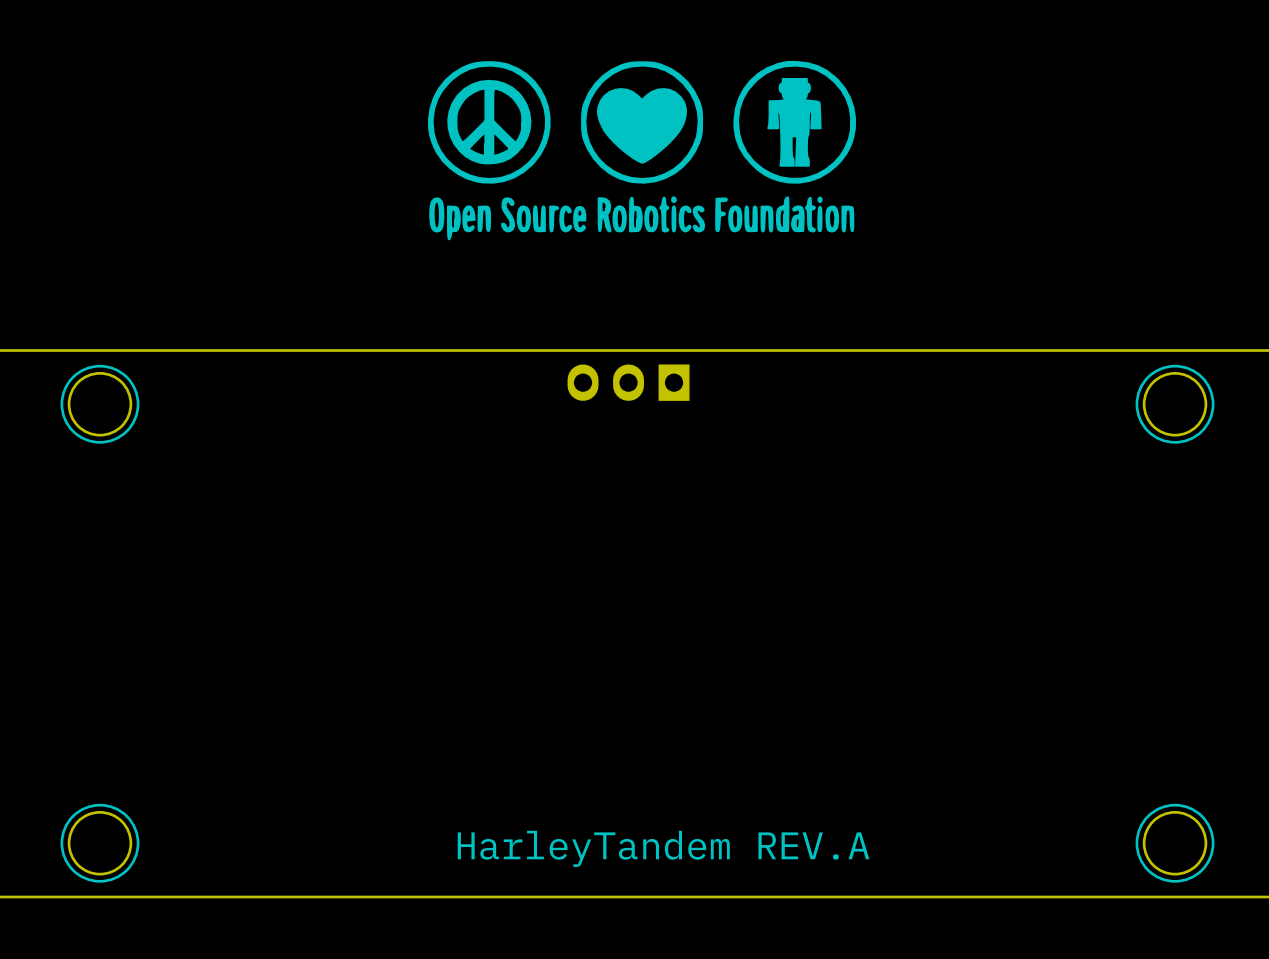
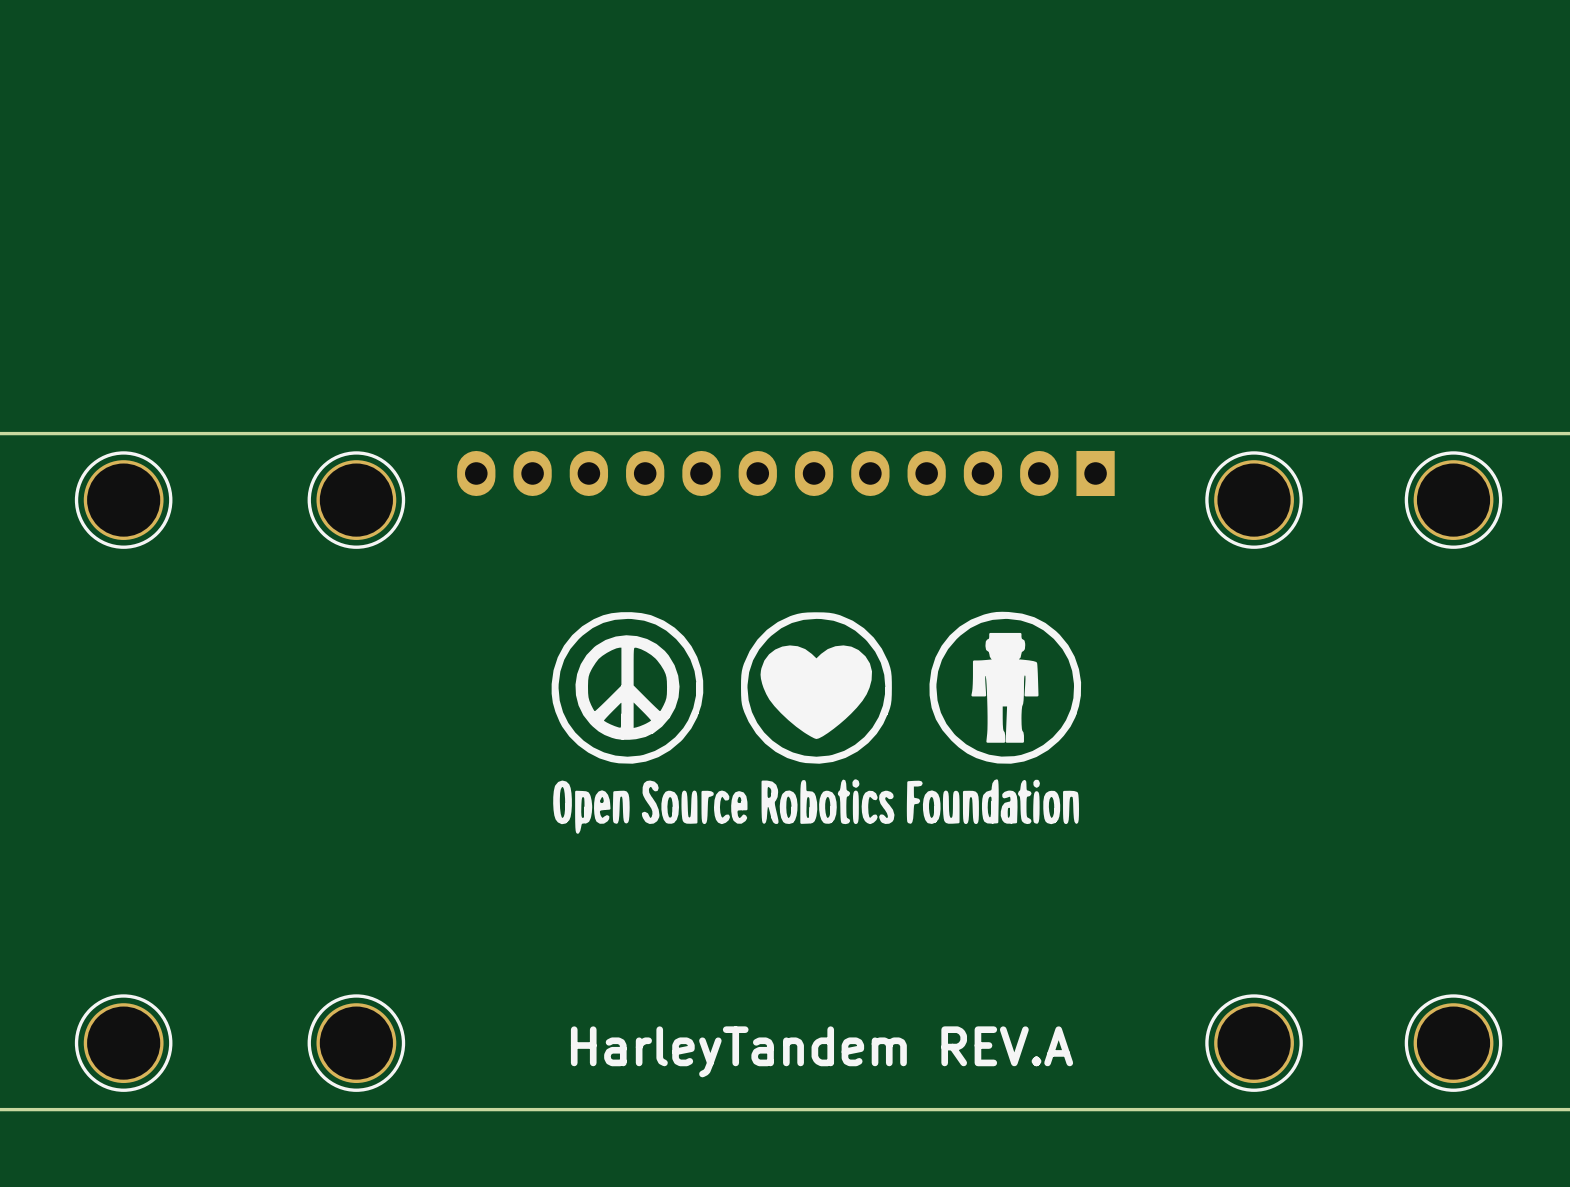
drawing position: (642, 150) -> (816, 722)
part footprint: [567, 364, 690, 401] -> [457, 450, 1115, 497]
part: none -> (356, 500)
part: none -> (1254, 500)
part: none -> (356, 1043)
part: none -> (1254, 1043)

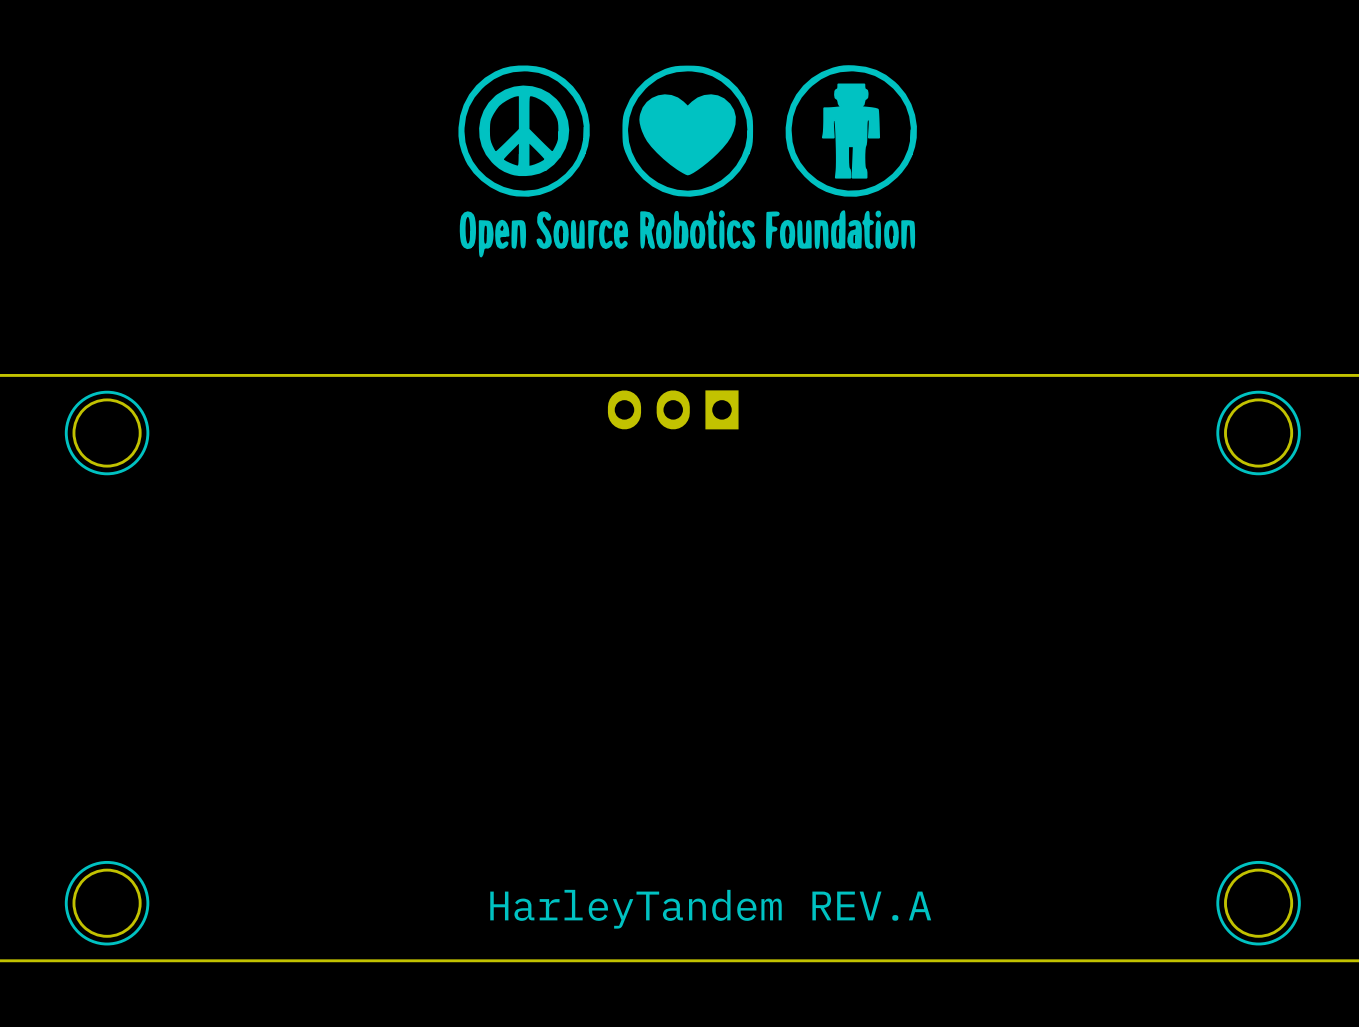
part footprint: [457, 450, 1115, 497] -> [607, 390, 739, 430]
part: (356, 500) -> none
part: (1254, 500) -> none
drawing position: (816, 722) -> (687, 161)
part: (356, 1043) -> none
part: (1254, 1043) -> none

